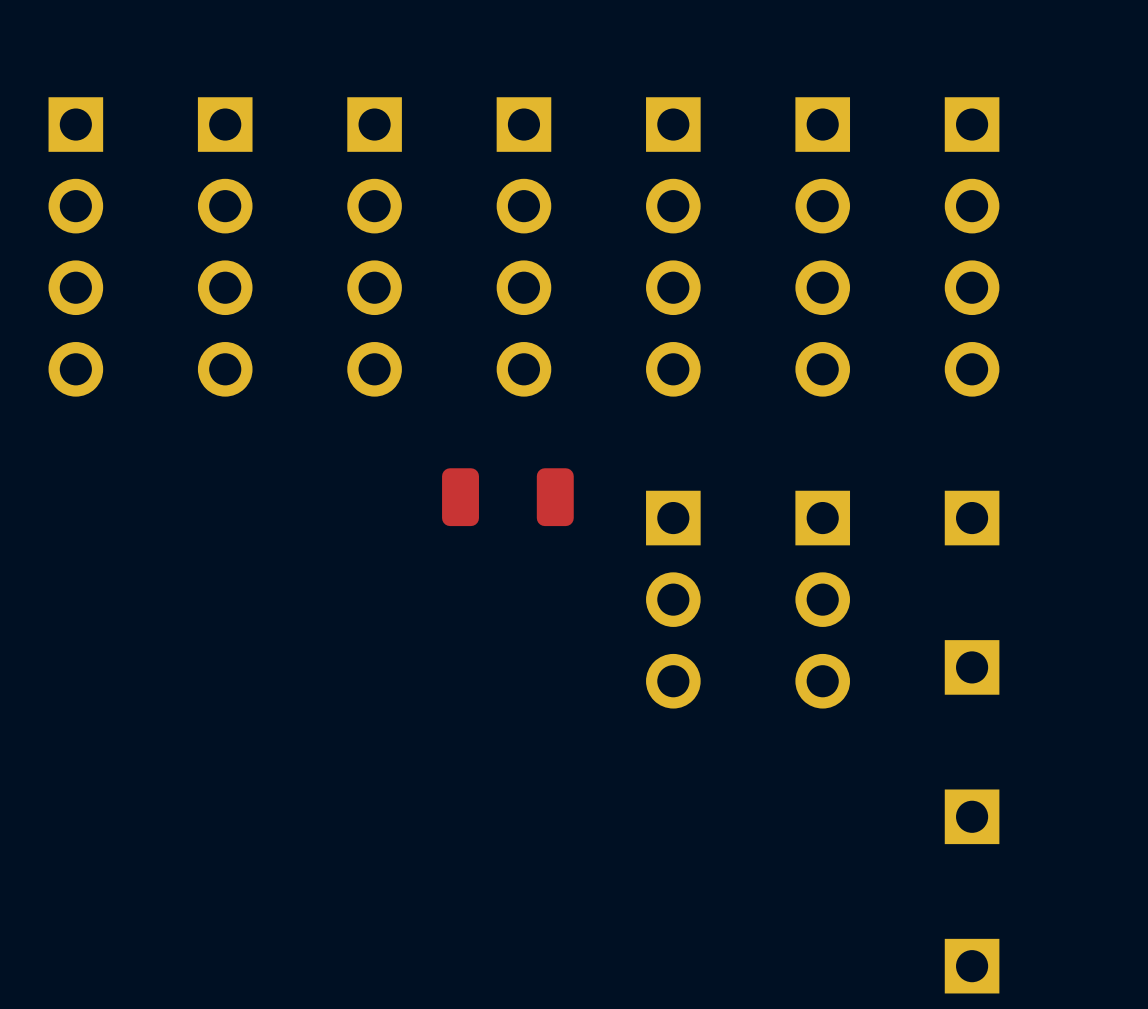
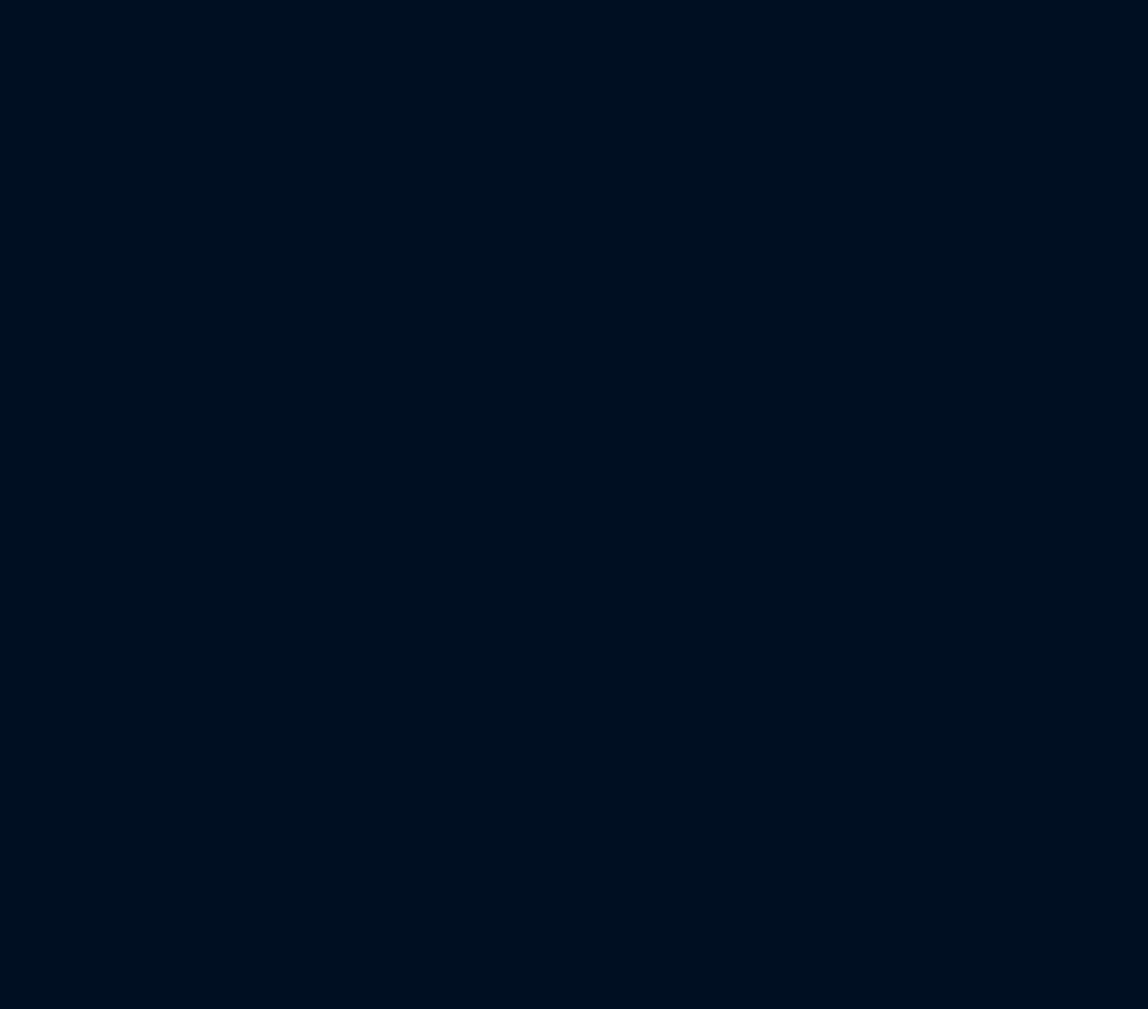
part: (75, 246) -> none
part: (225, 246) -> none
part: (374, 246) -> none
part: (523, 246) -> none
part: (673, 246) -> none
part: (822, 246) -> none
part: (972, 246) -> none
part: (507, 497) -> none
part: (972, 518) -> none
part: (673, 599) -> none
part: (822, 599) -> none
part: (972, 667) -> none
part: (972, 816) -> none
part: (972, 966) -> none

